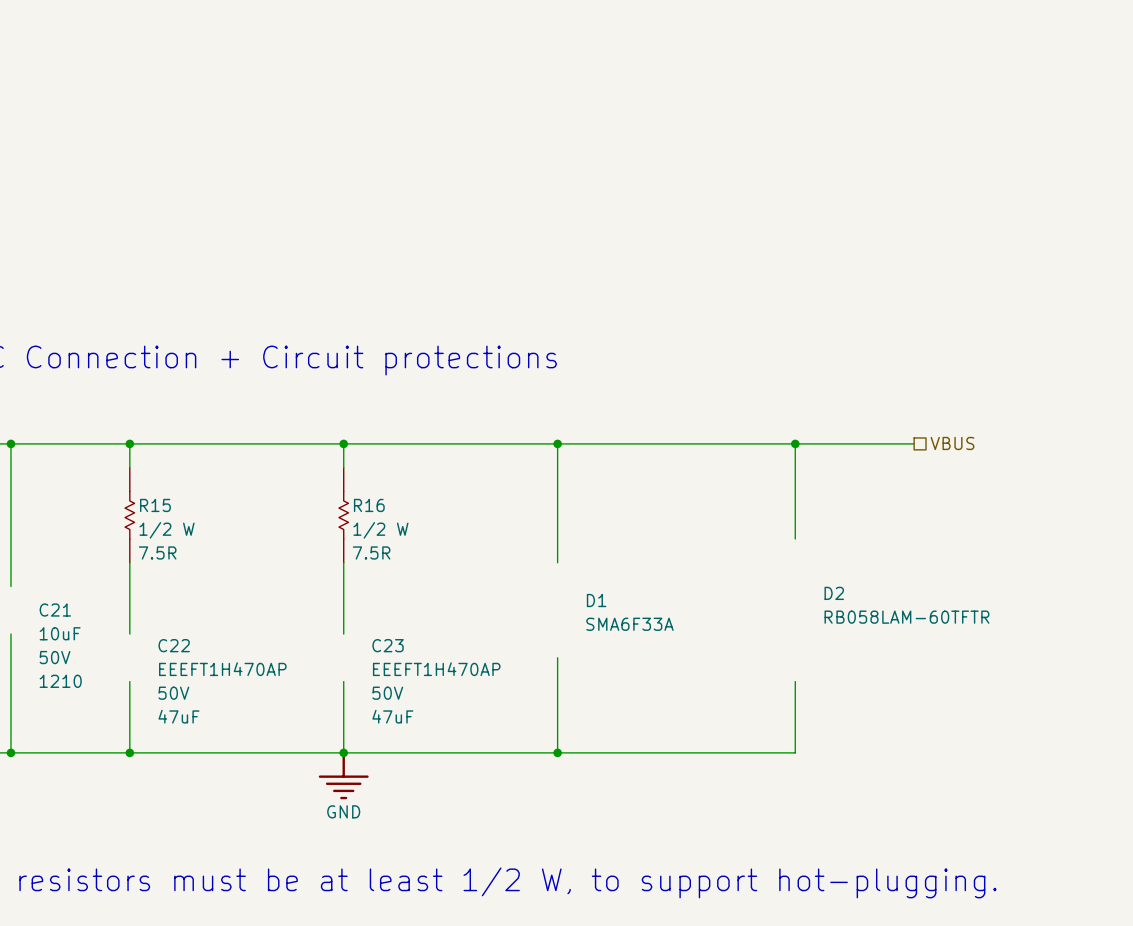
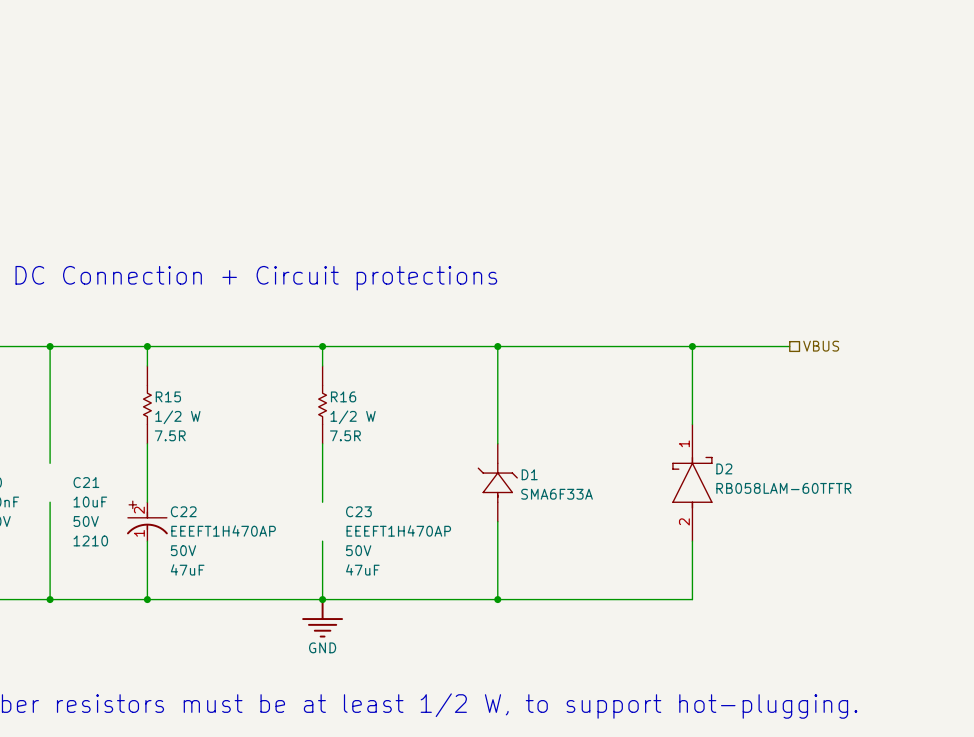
D2 symbol: [824, 586, 990, 624] -> [672, 424, 712, 542]
D1 symbol: [586, 593, 674, 631] -> [478, 443, 518, 522]
C22 symbol: [158, 639, 287, 724] -> [126, 502, 168, 542]

